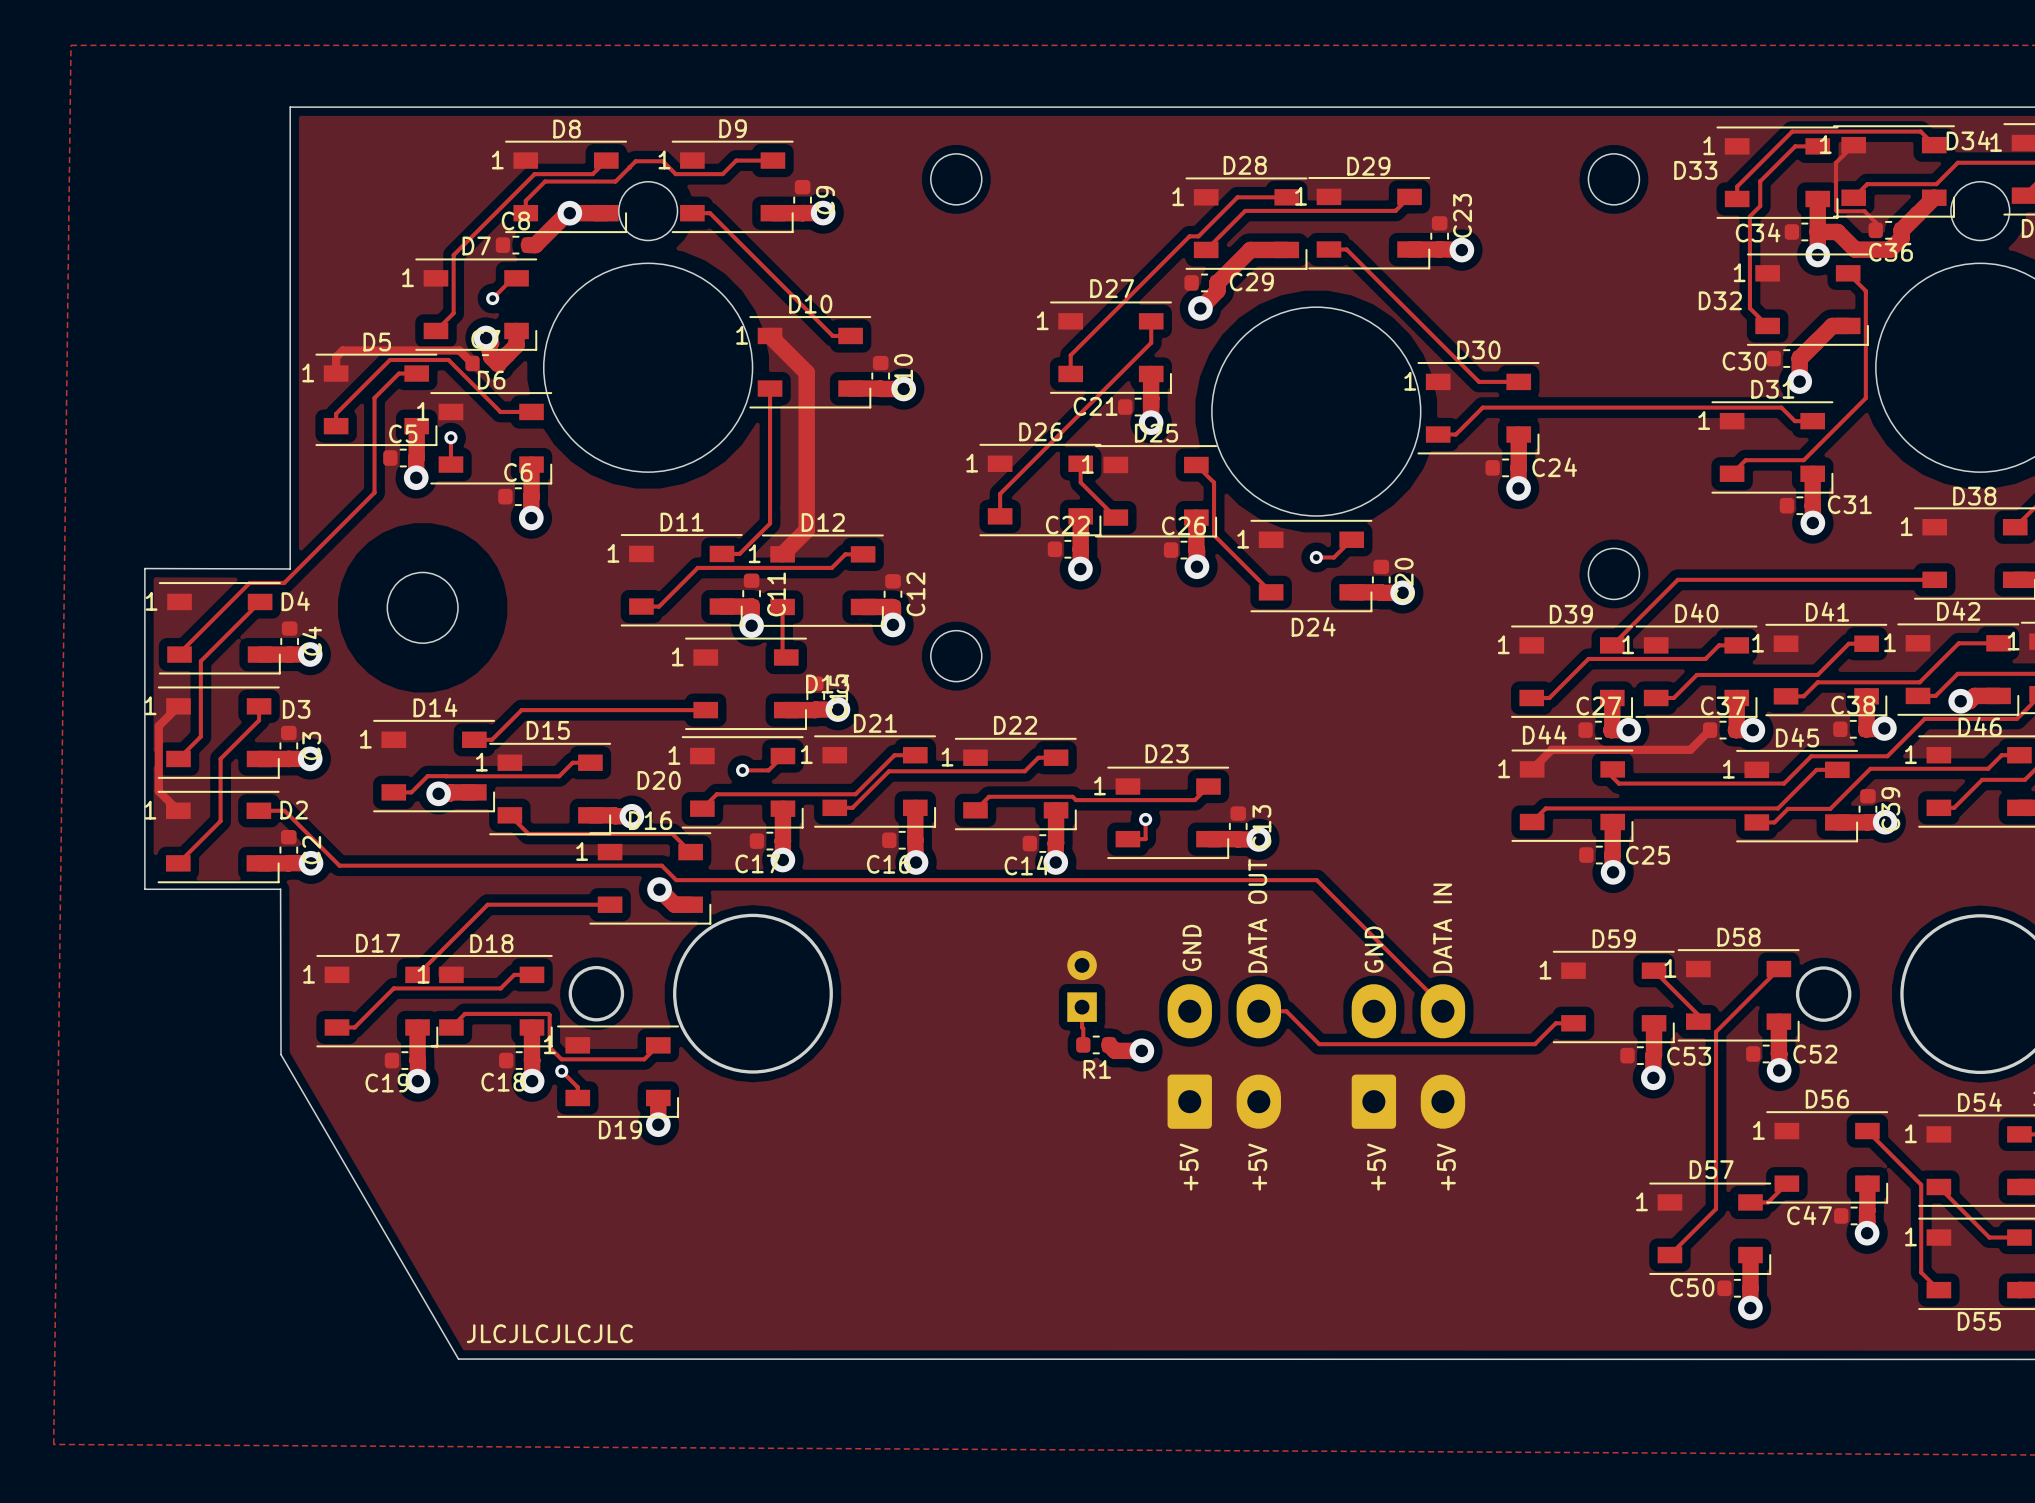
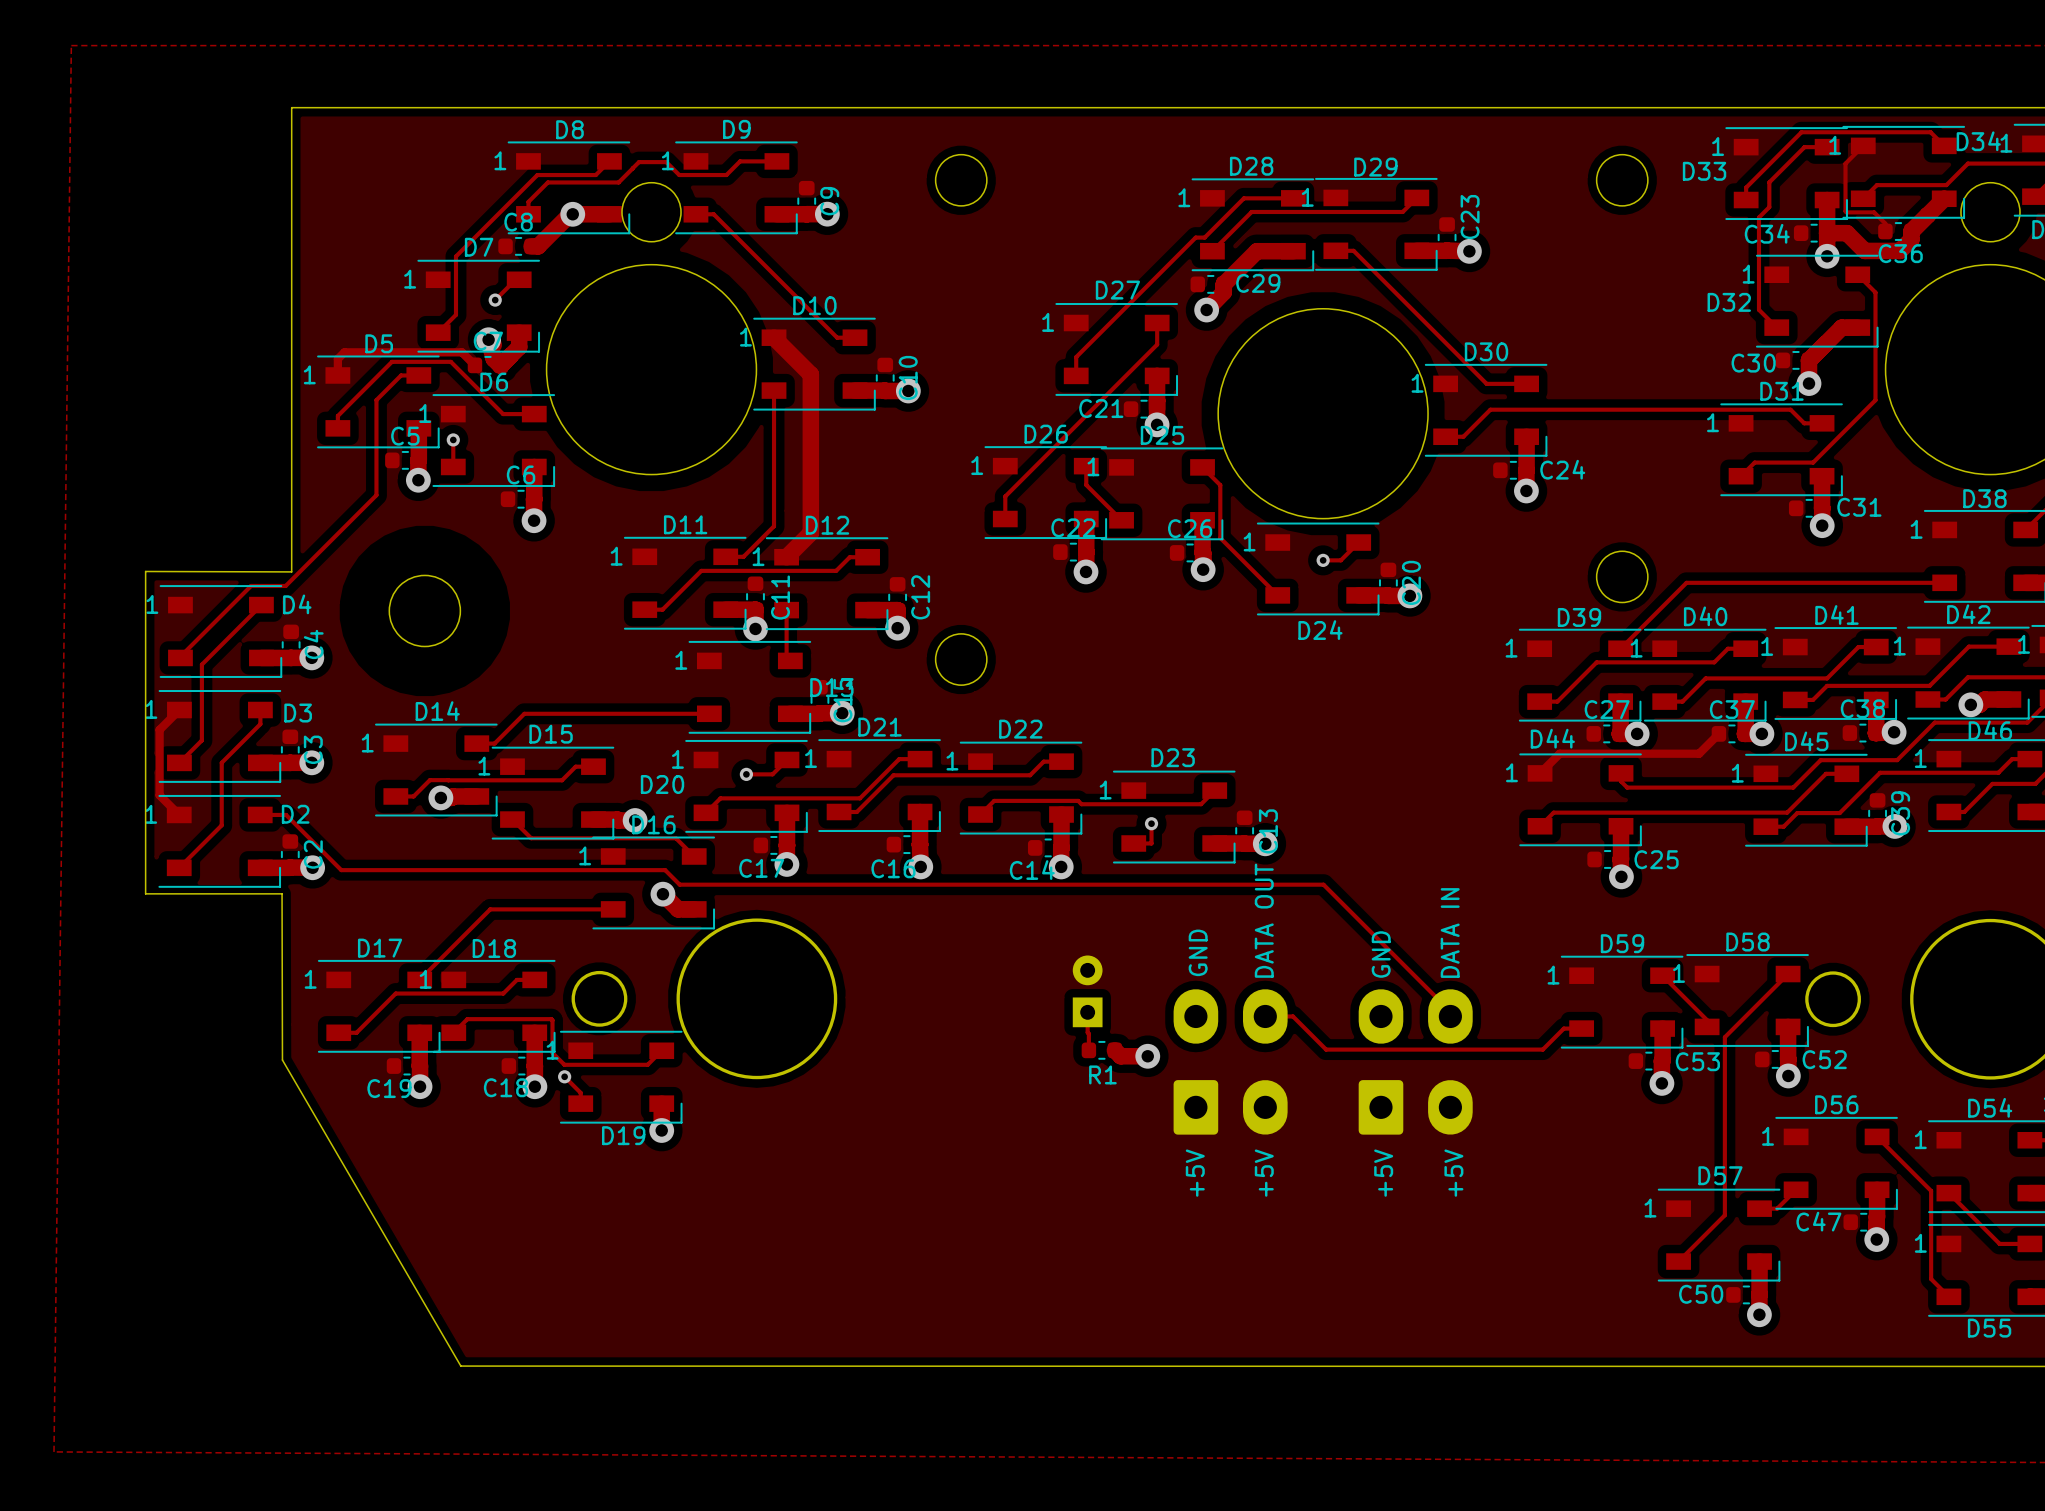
text: JLCJLCJLCJLC (549, 1333) -> none

